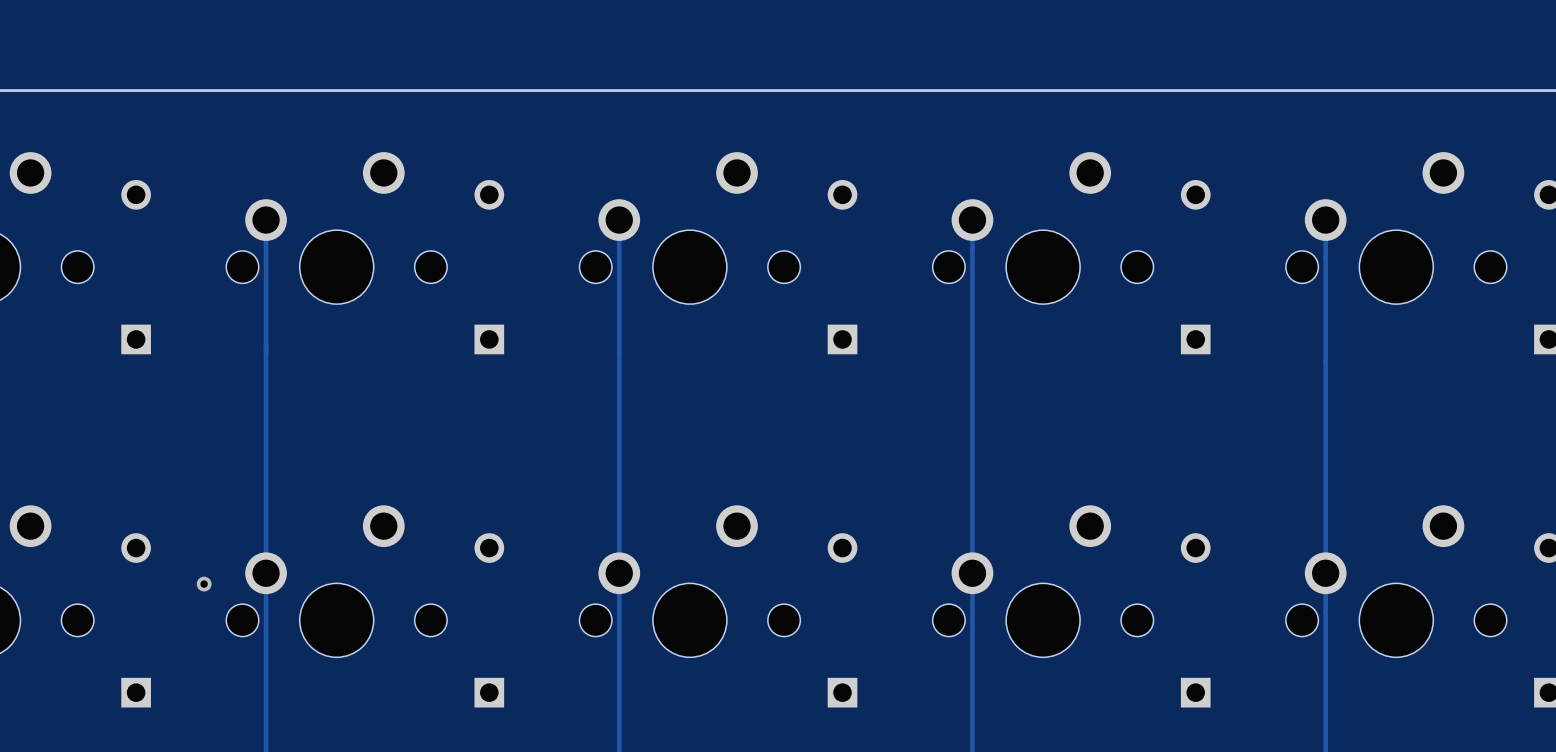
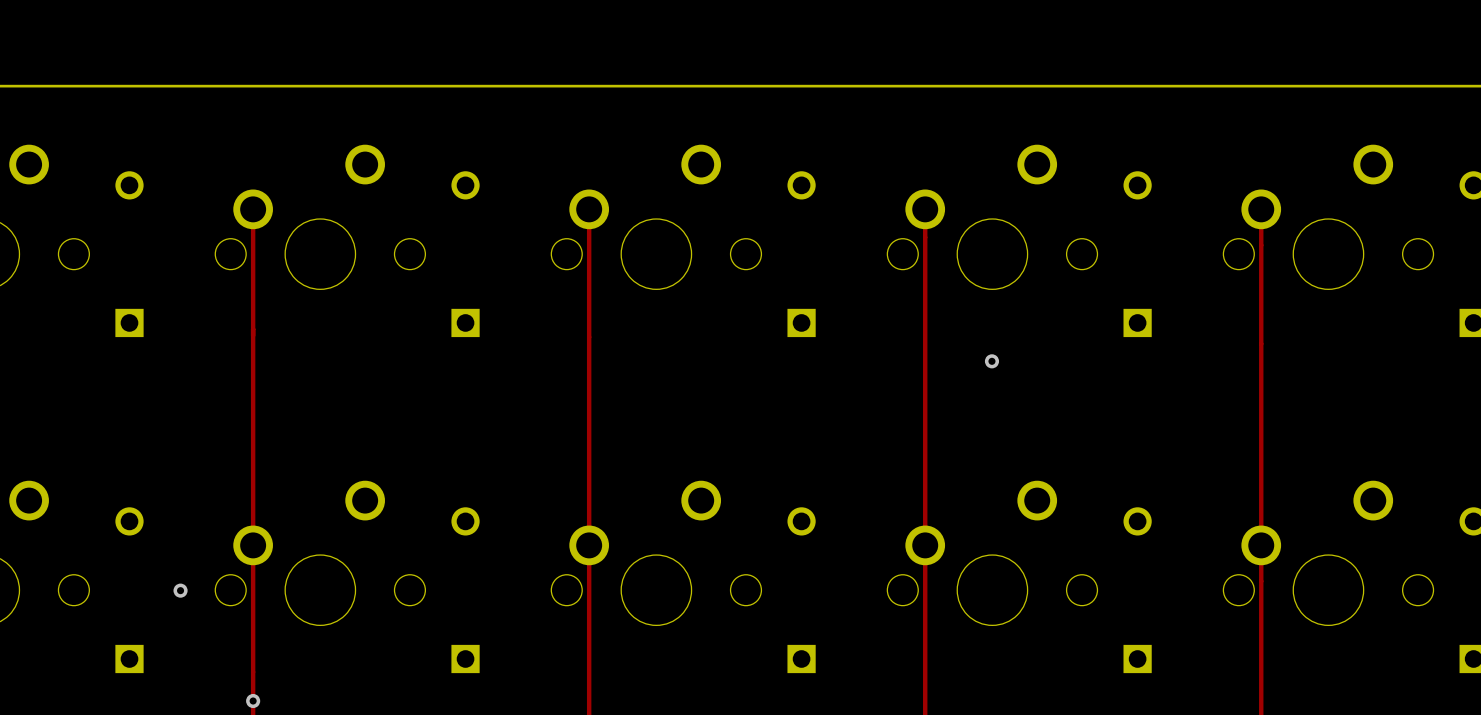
via: none -> (991, 361)
via position: (204, 584) -> (180, 590)
via: none -> (253, 701)

